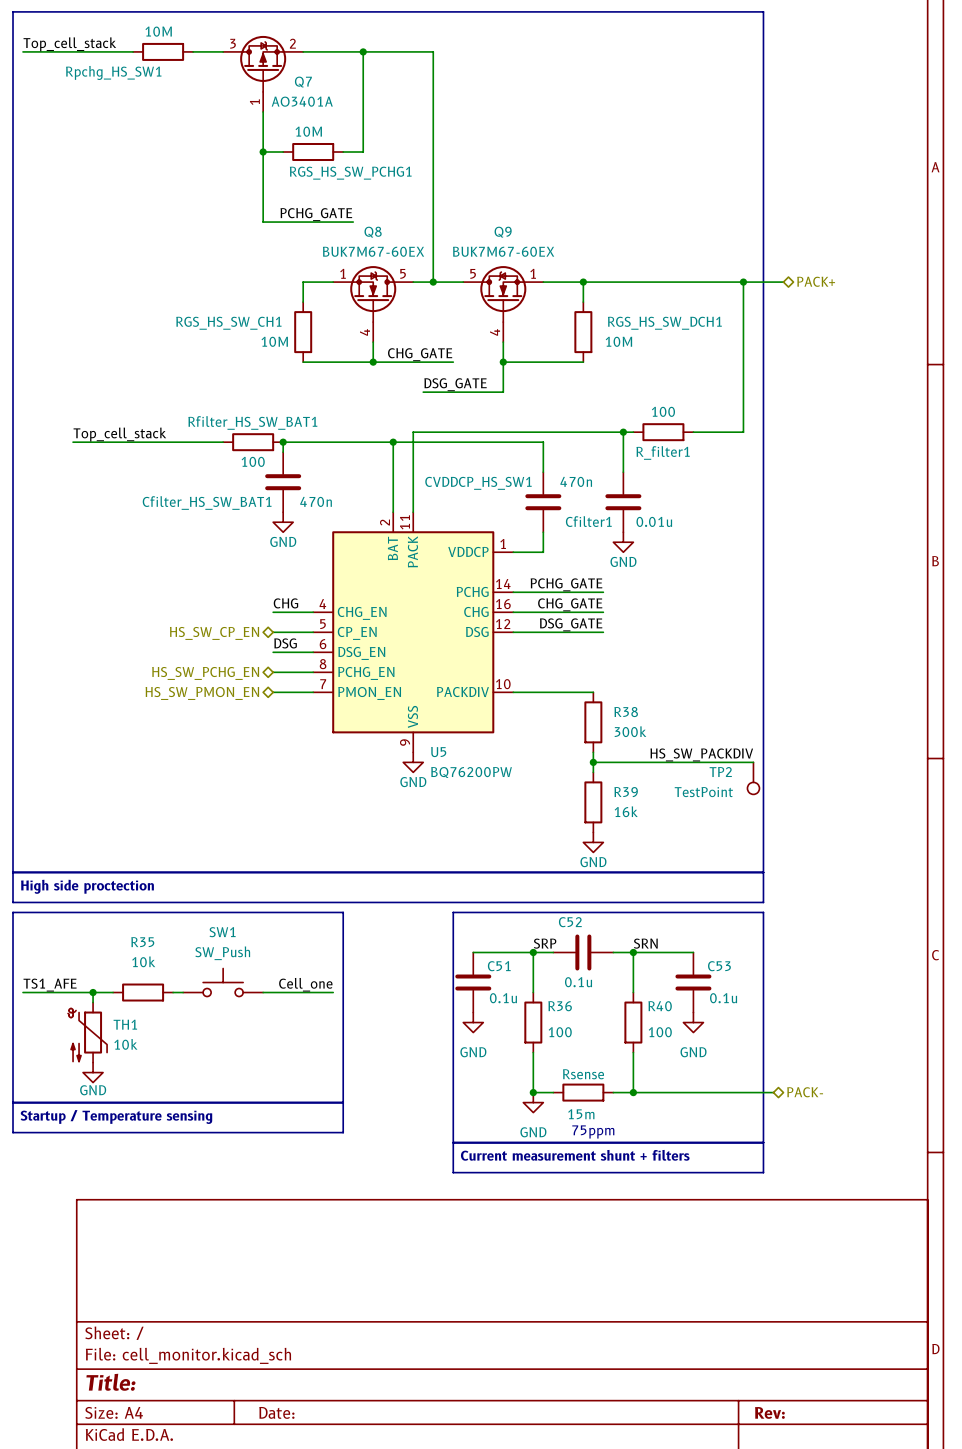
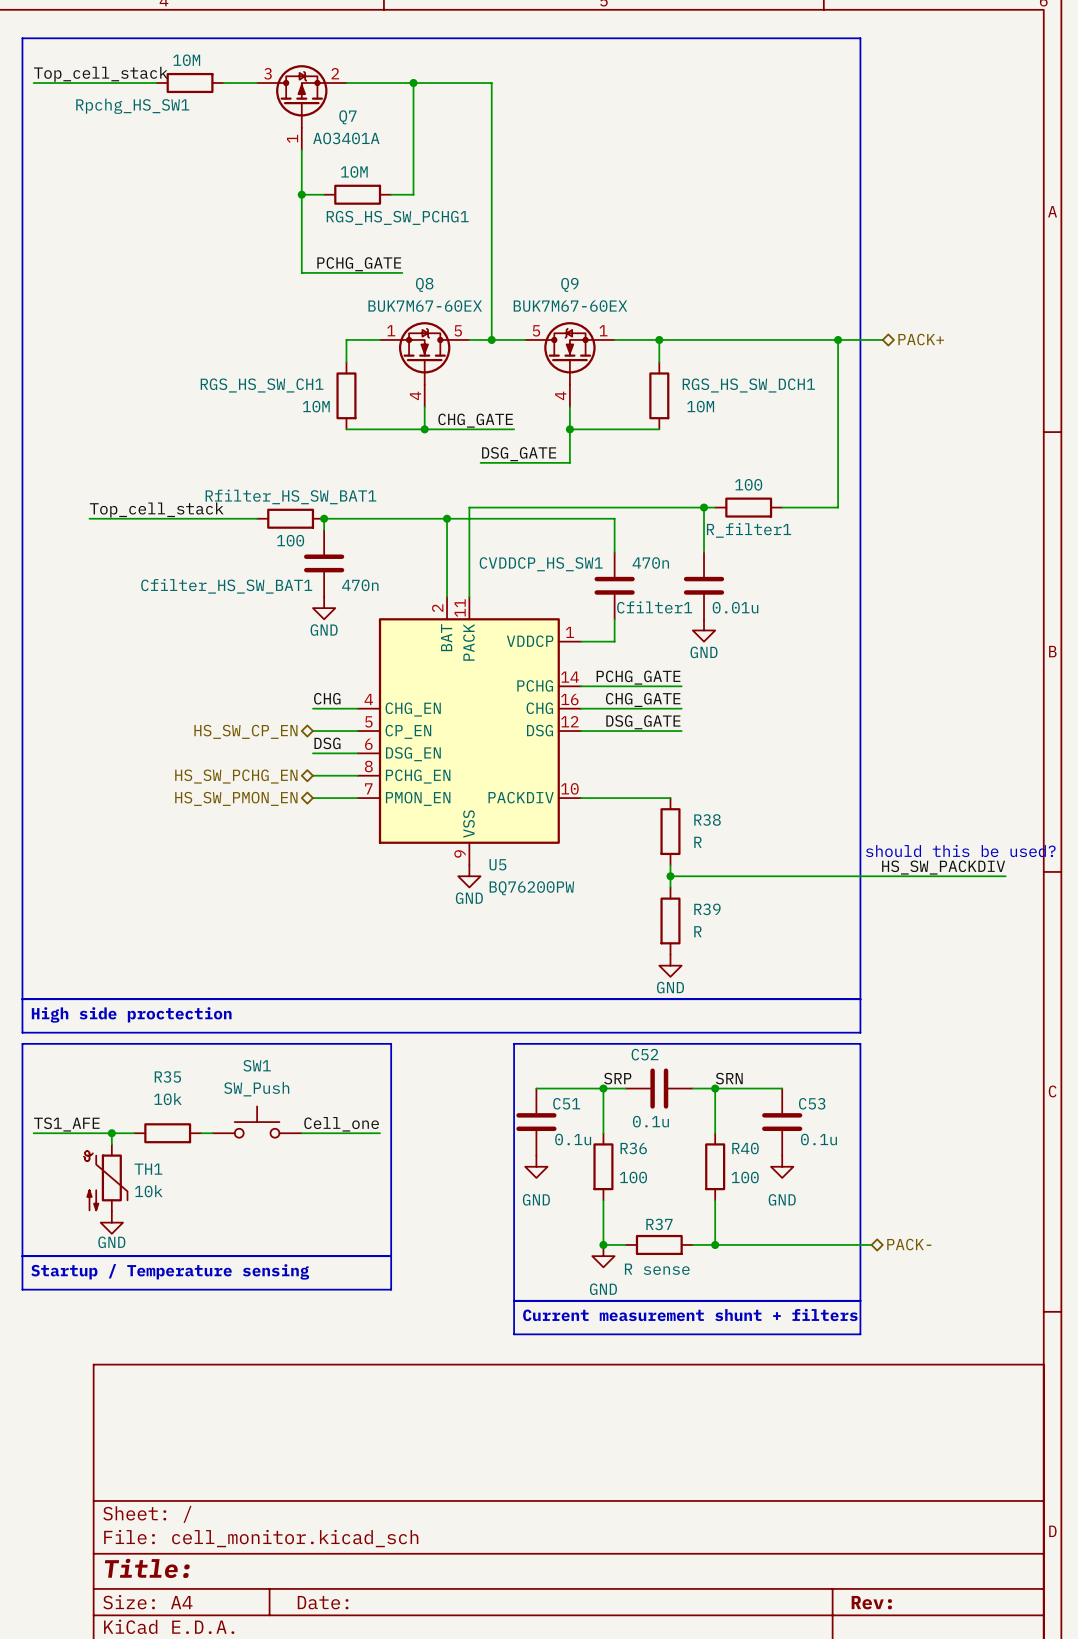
R38 value: 300k (630, 731) -> R (697, 842)
text: none -> should this be used? (960, 851)
label position: HS_SW_PACKDIV (701, 754) -> HS_SW_PACKDIV (943, 867)
wire: none -> (849, 876) (1005, 876)
TP2: TestPoint (753, 778) -> none
R39 value: 16k (626, 811) -> R (697, 931)
Rsense name: Rsense (583, 1074) -> R37 (659, 1224)
Rsense value: 15m (581, 1114) -> R sense (657, 1269)
text: 75ppm (593, 1131) -> none

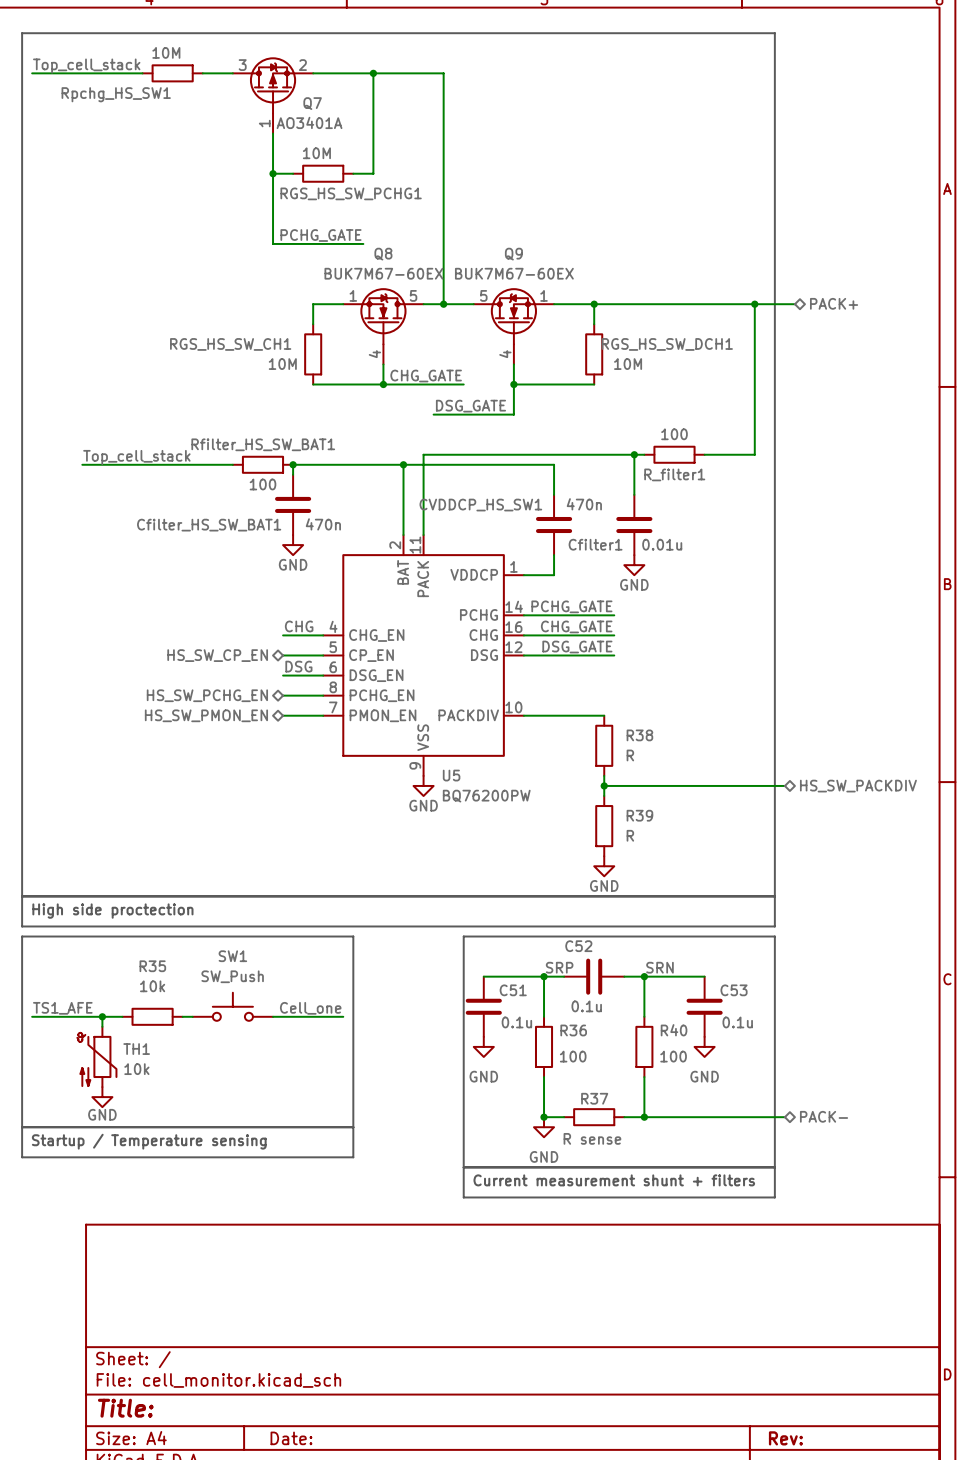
text: should this be used? (960, 851) -> none
label: HS_SW_PACKDIV (943, 867) -> none
wire: (871, 876) (1005, 876) -> none
hierarchical label: none -> HS_SW_PACKDIV (858, 786)

